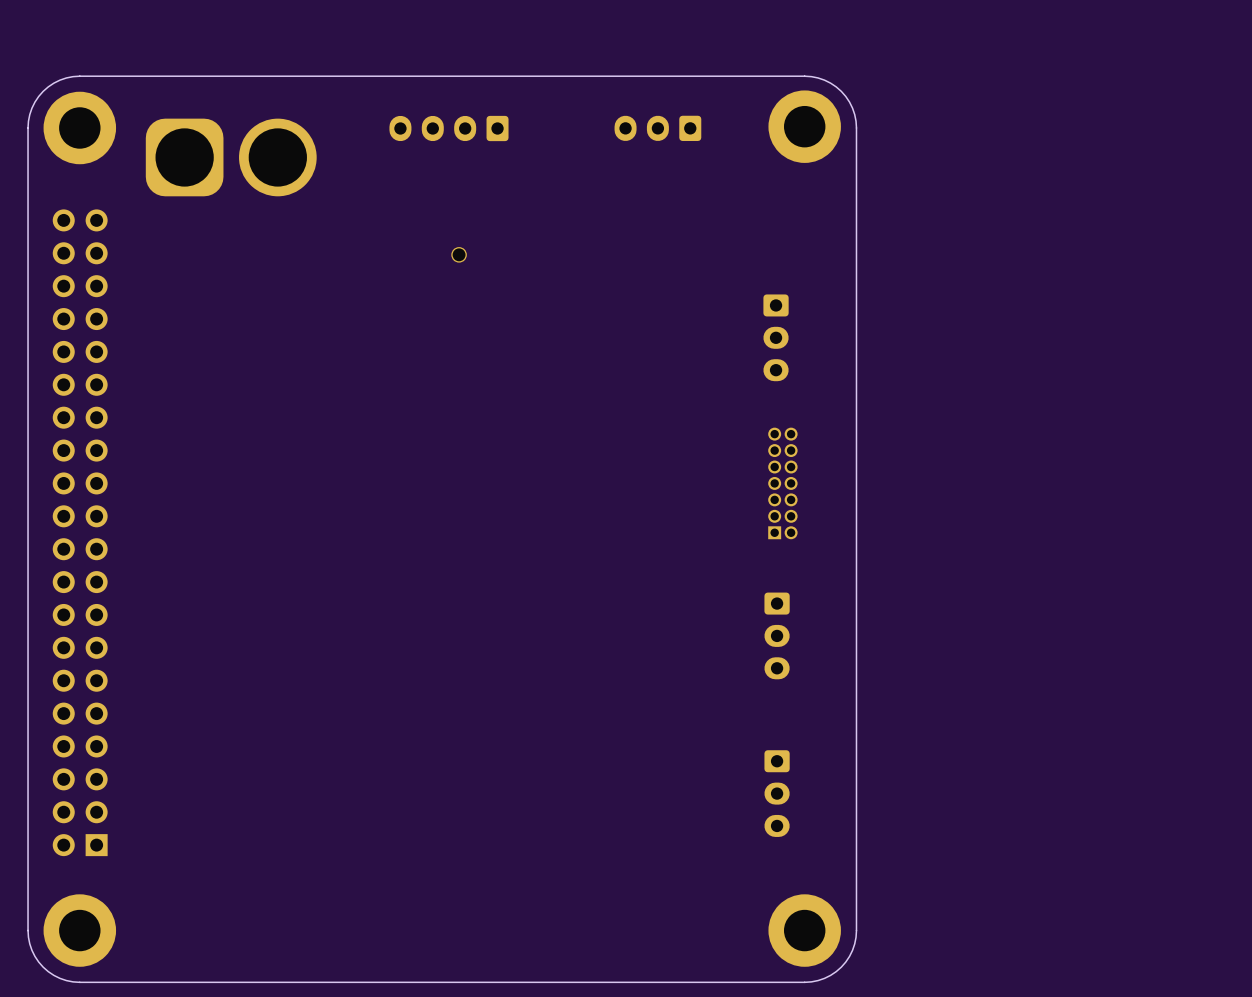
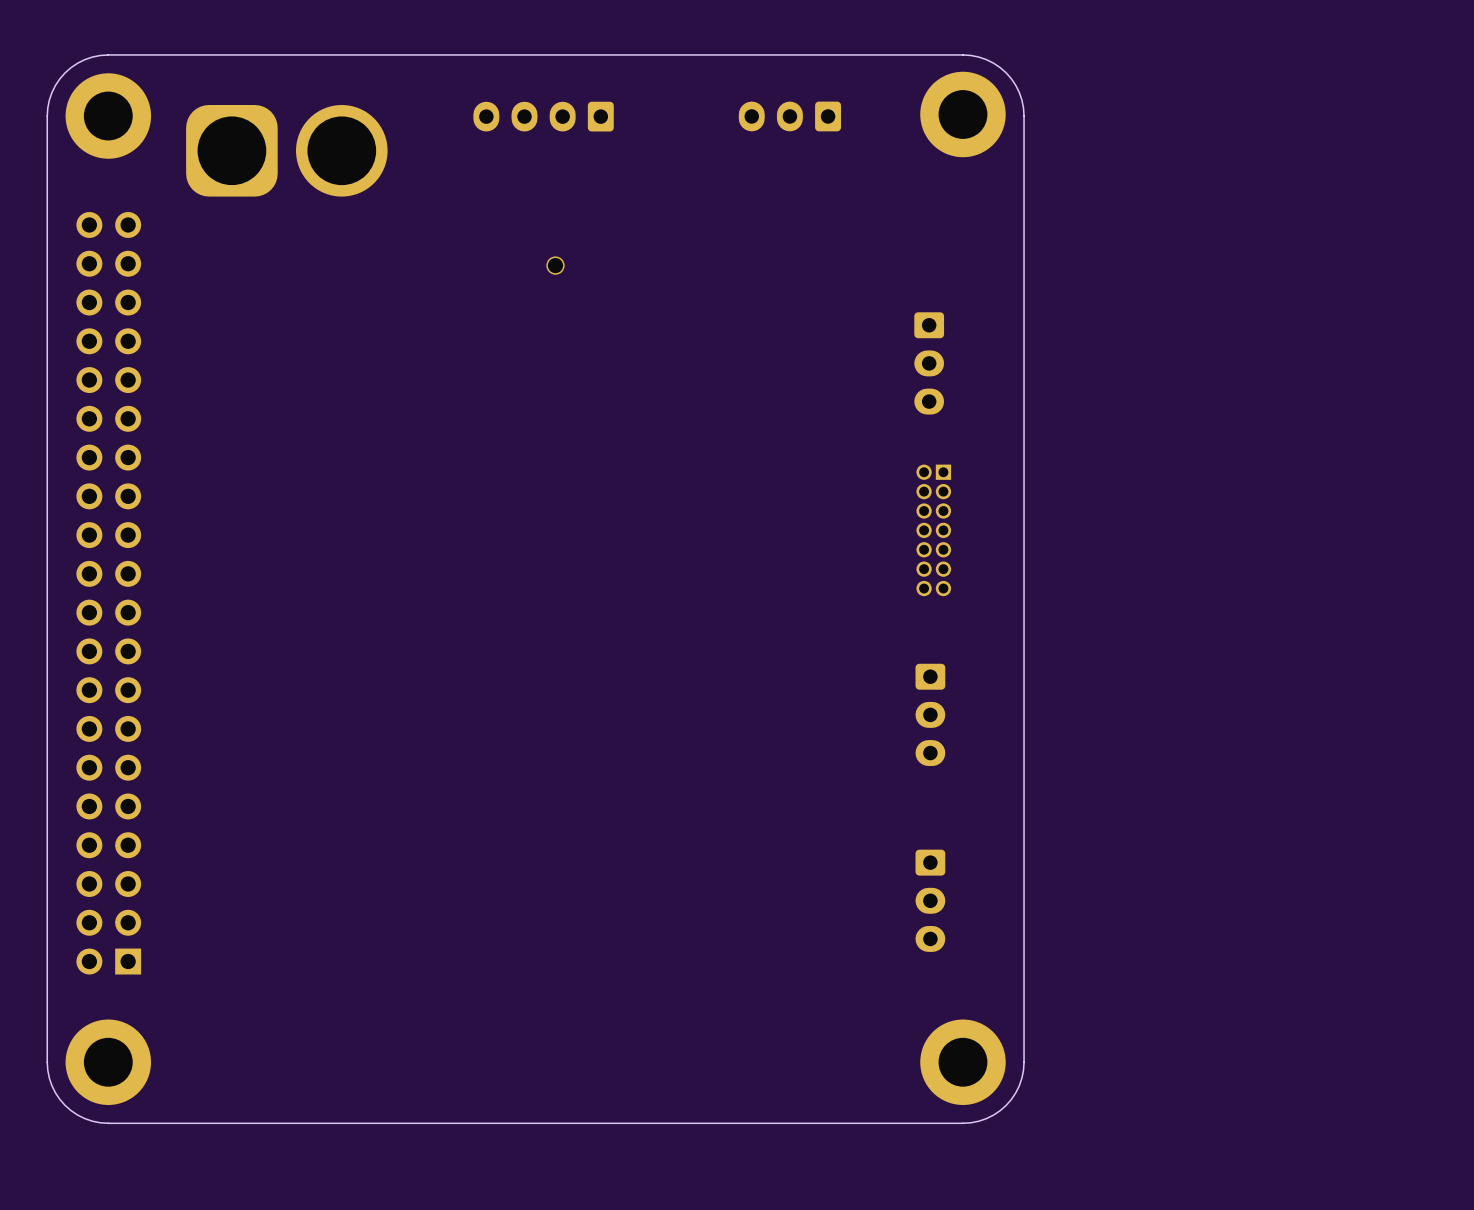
part rotation: 0° (782, 483) -> 180° (933, 530)

